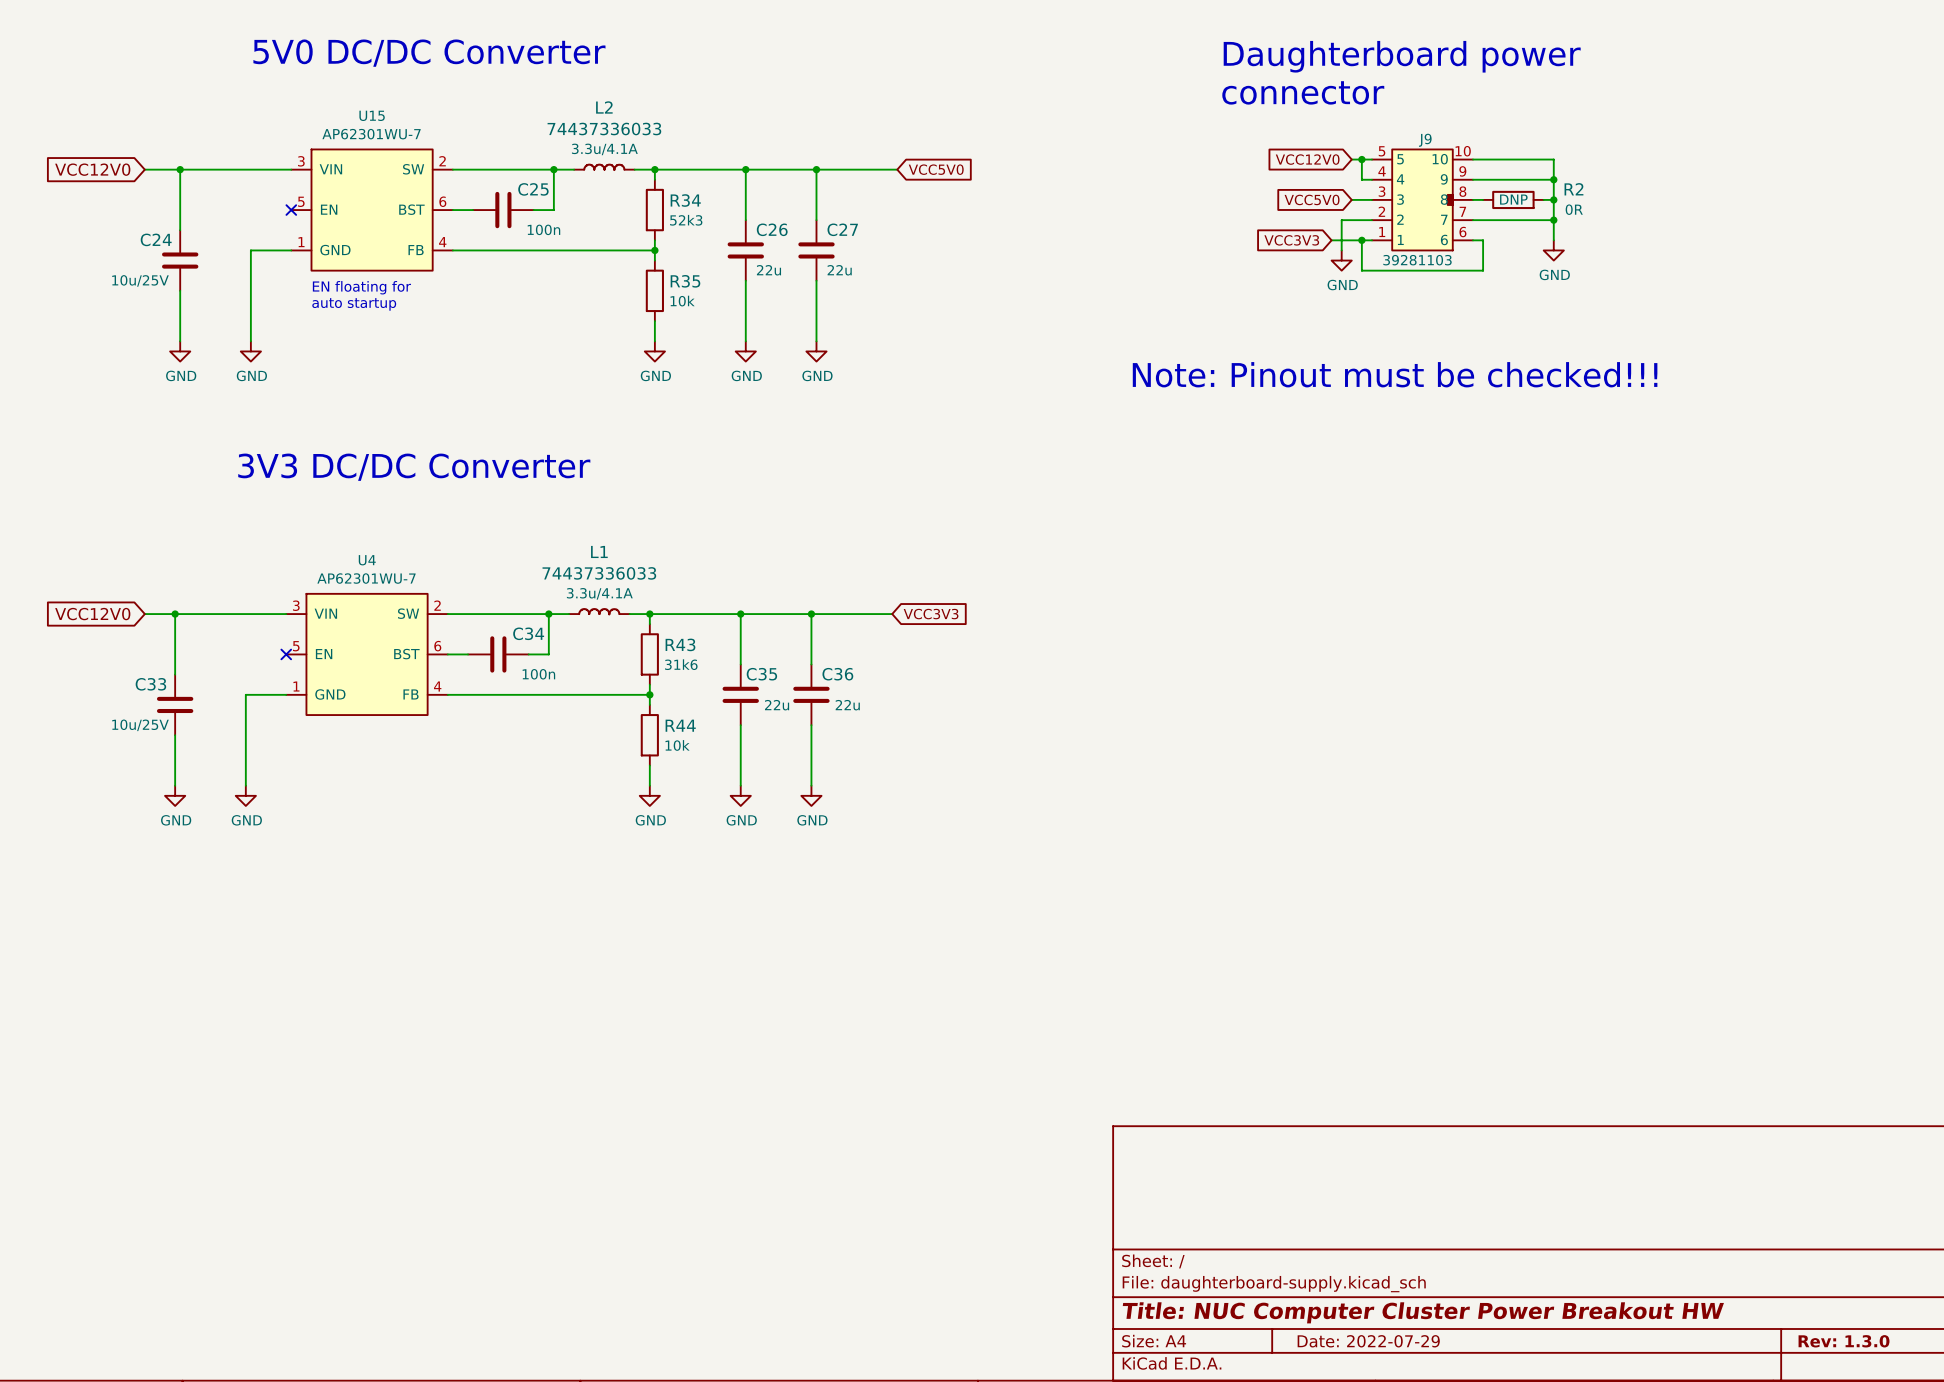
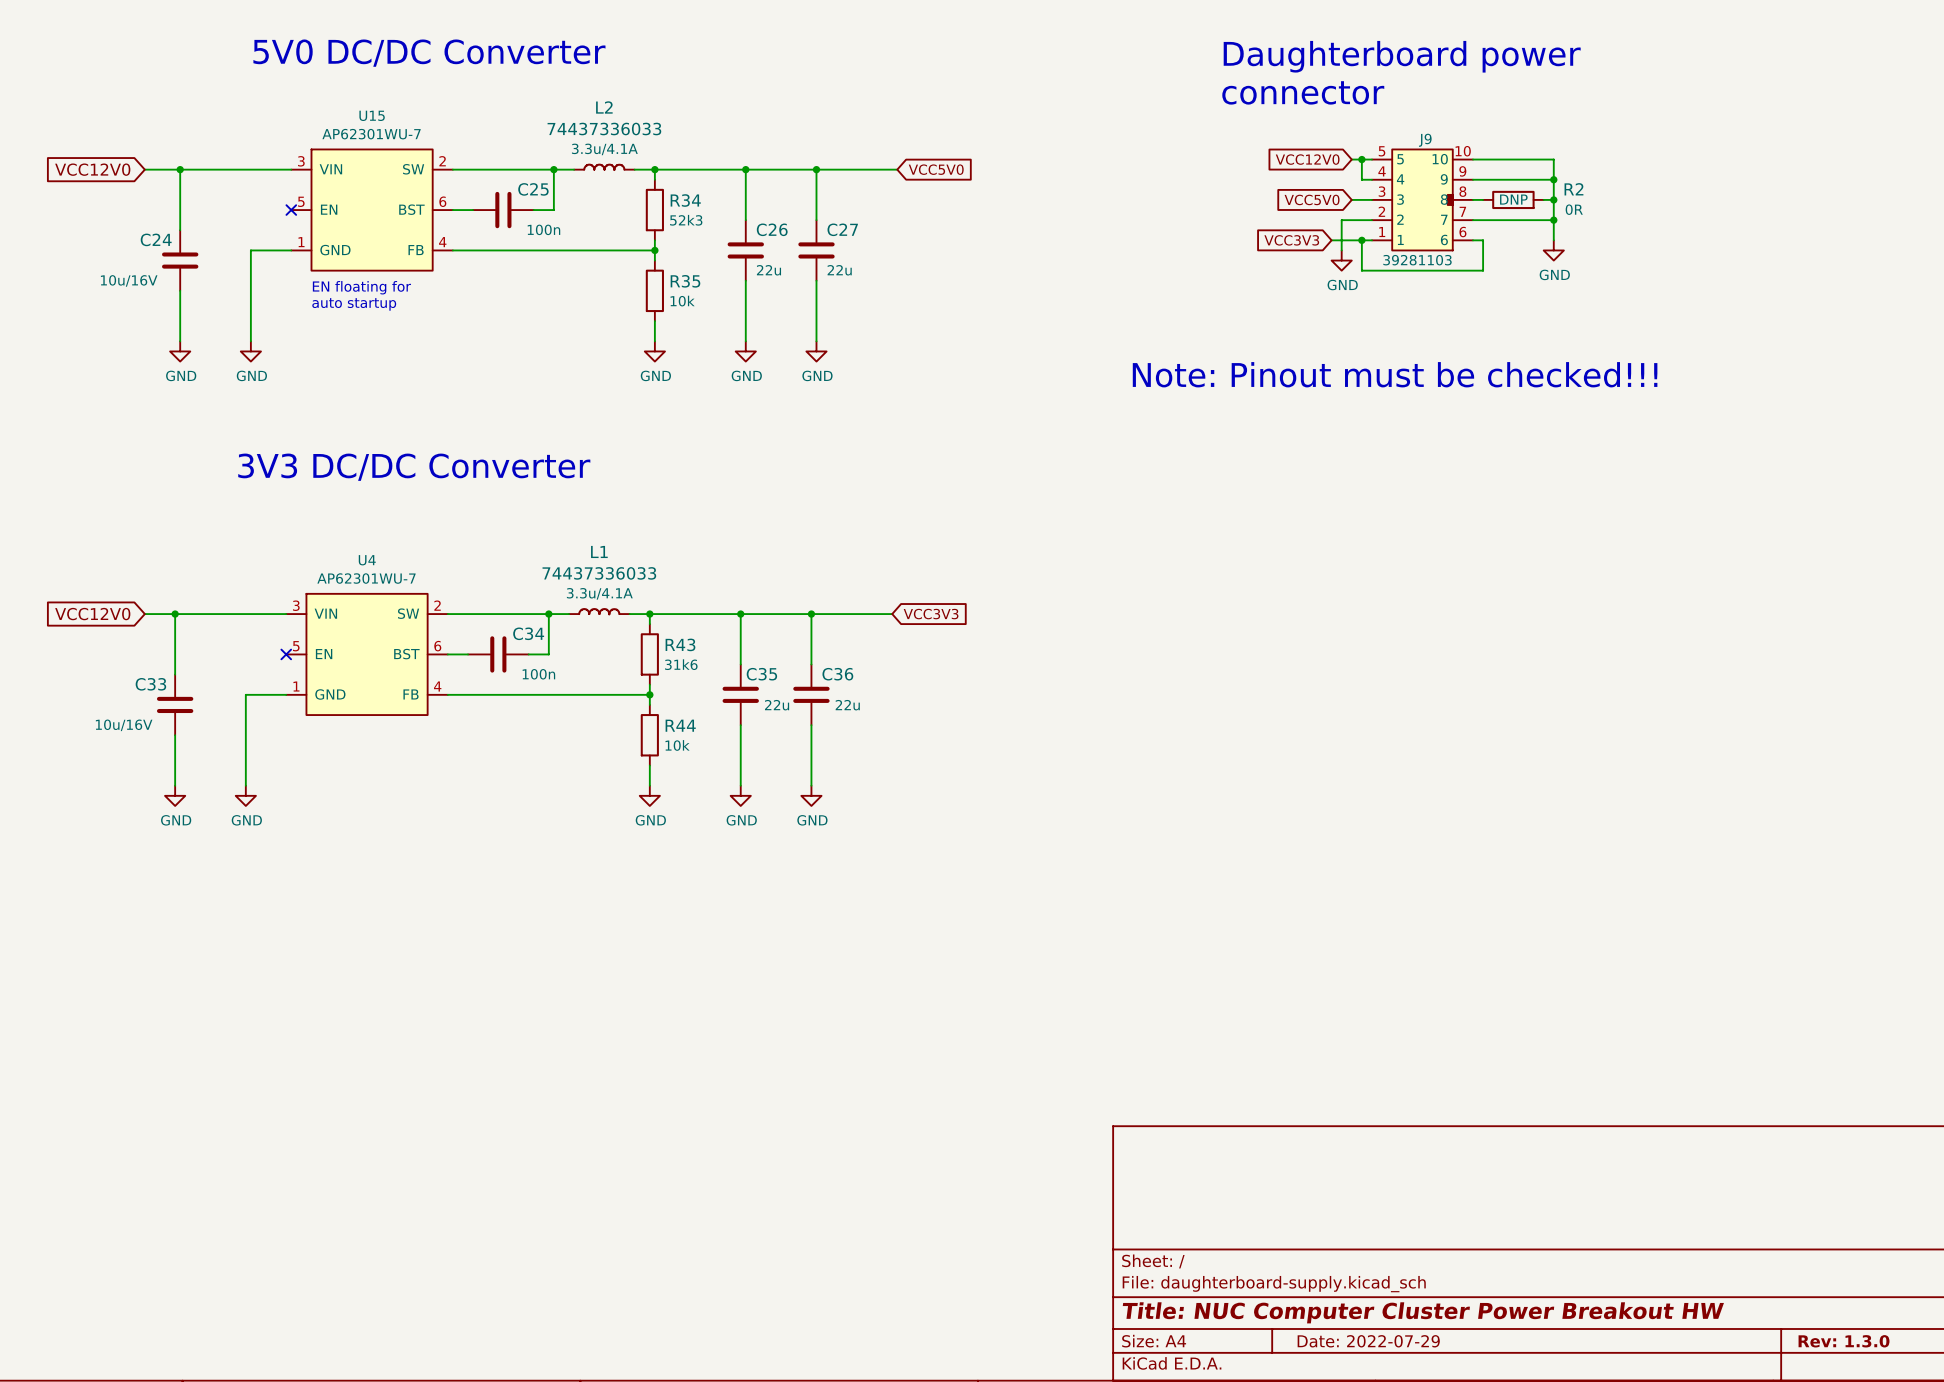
C24 text: 10u/25V (140, 280) -> 10u/16V (129, 280)
C33 text: 10u/25V (140, 725) -> 10u/16V (124, 725)

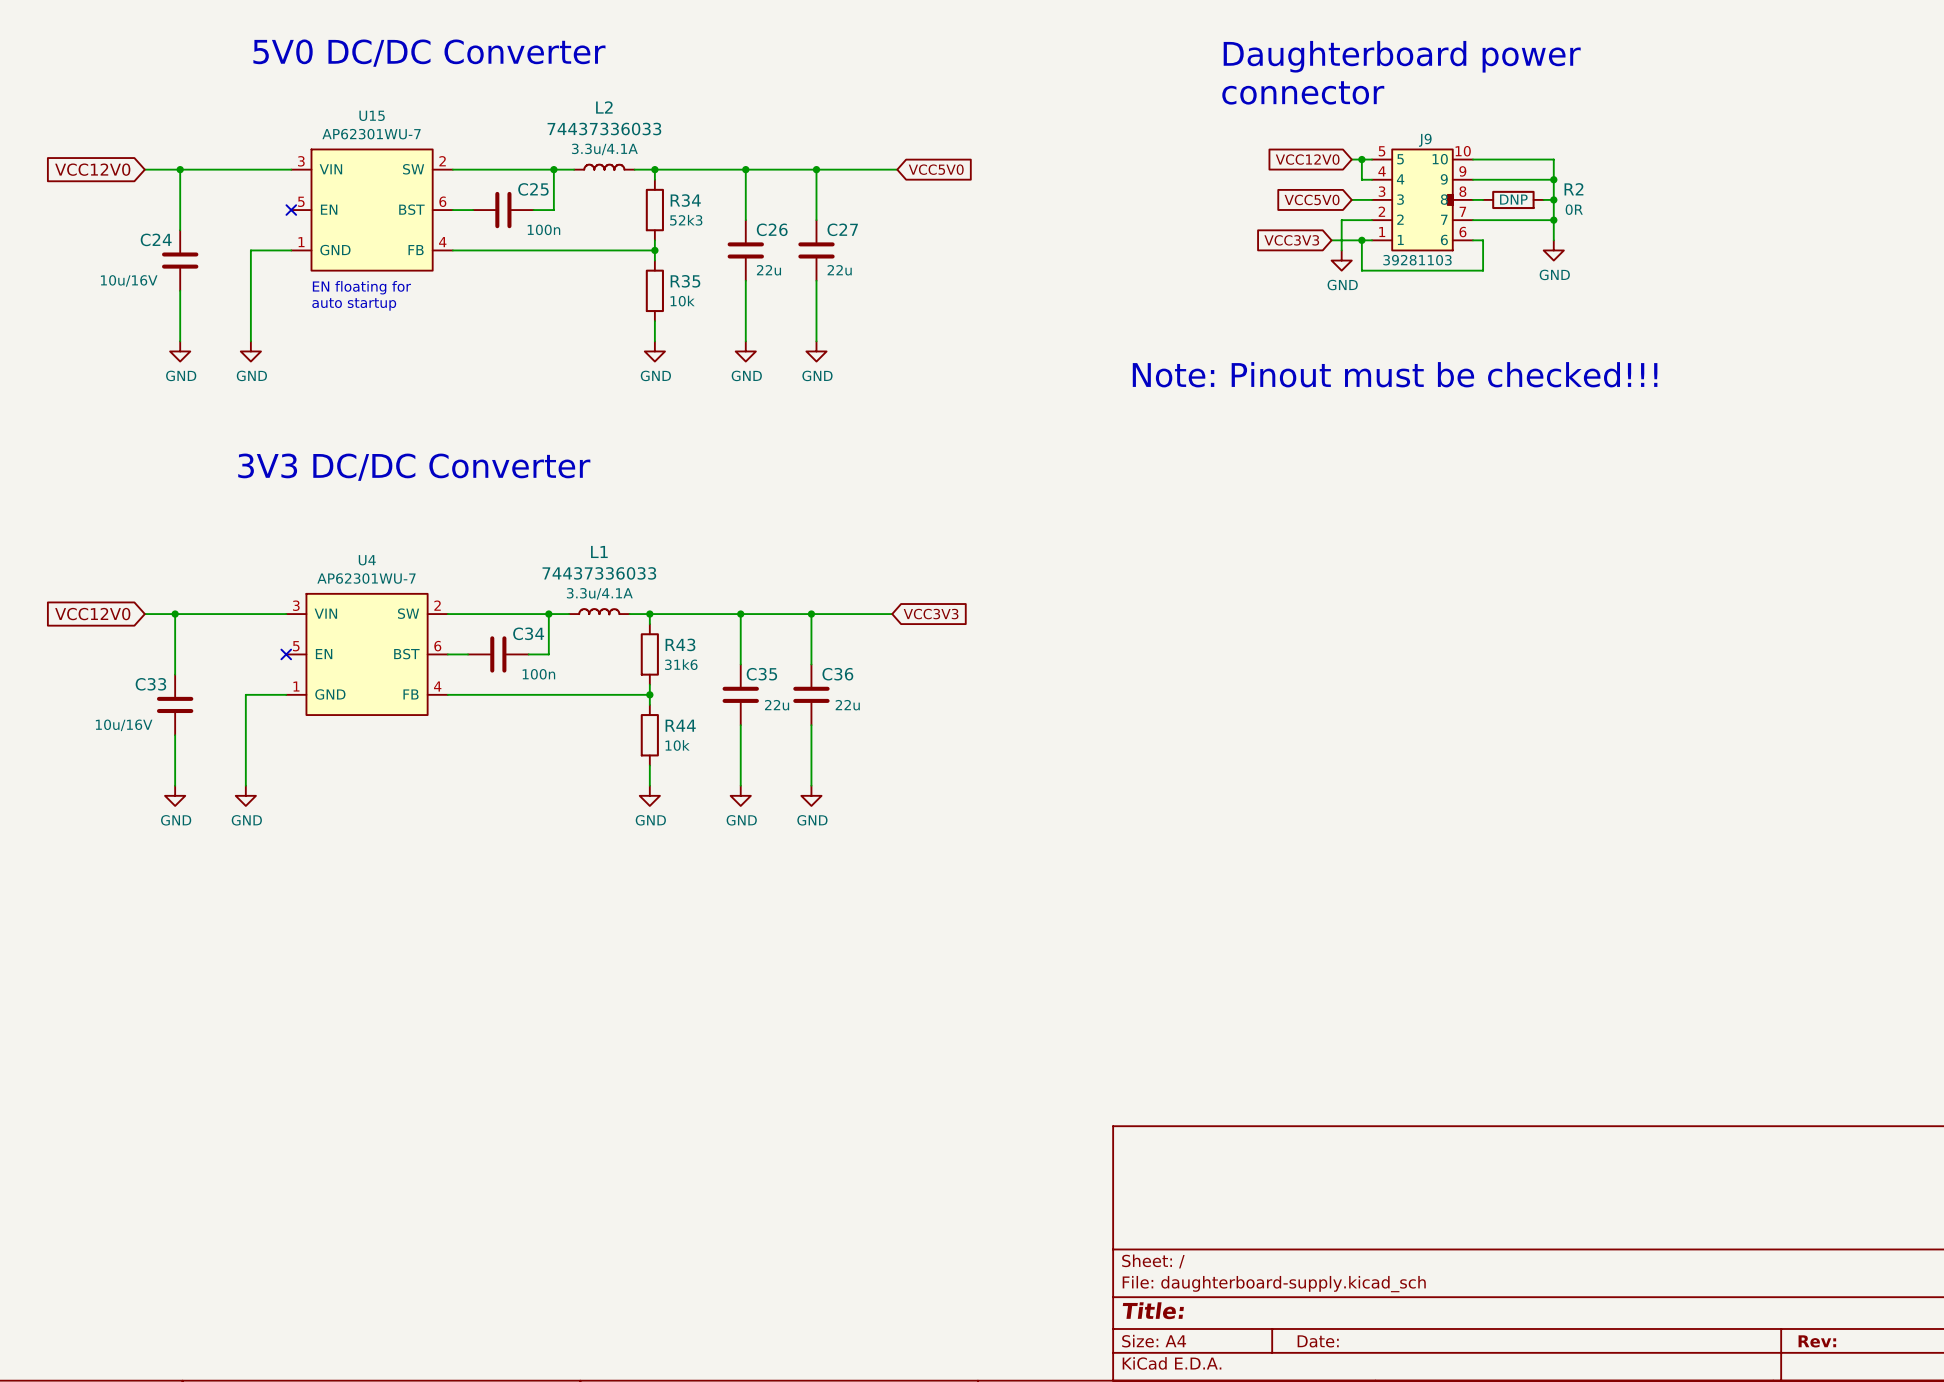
title block: Title: NUC Computer Cluster Power Breakout HW (1423, 1312) -> Title: (1153, 1310)
title block: Date: 2022-07-29 (1368, 1341) -> Date: (1318, 1341)
title block: Rev: 1.3.0 (1844, 1341) -> Rev: (1817, 1341)

